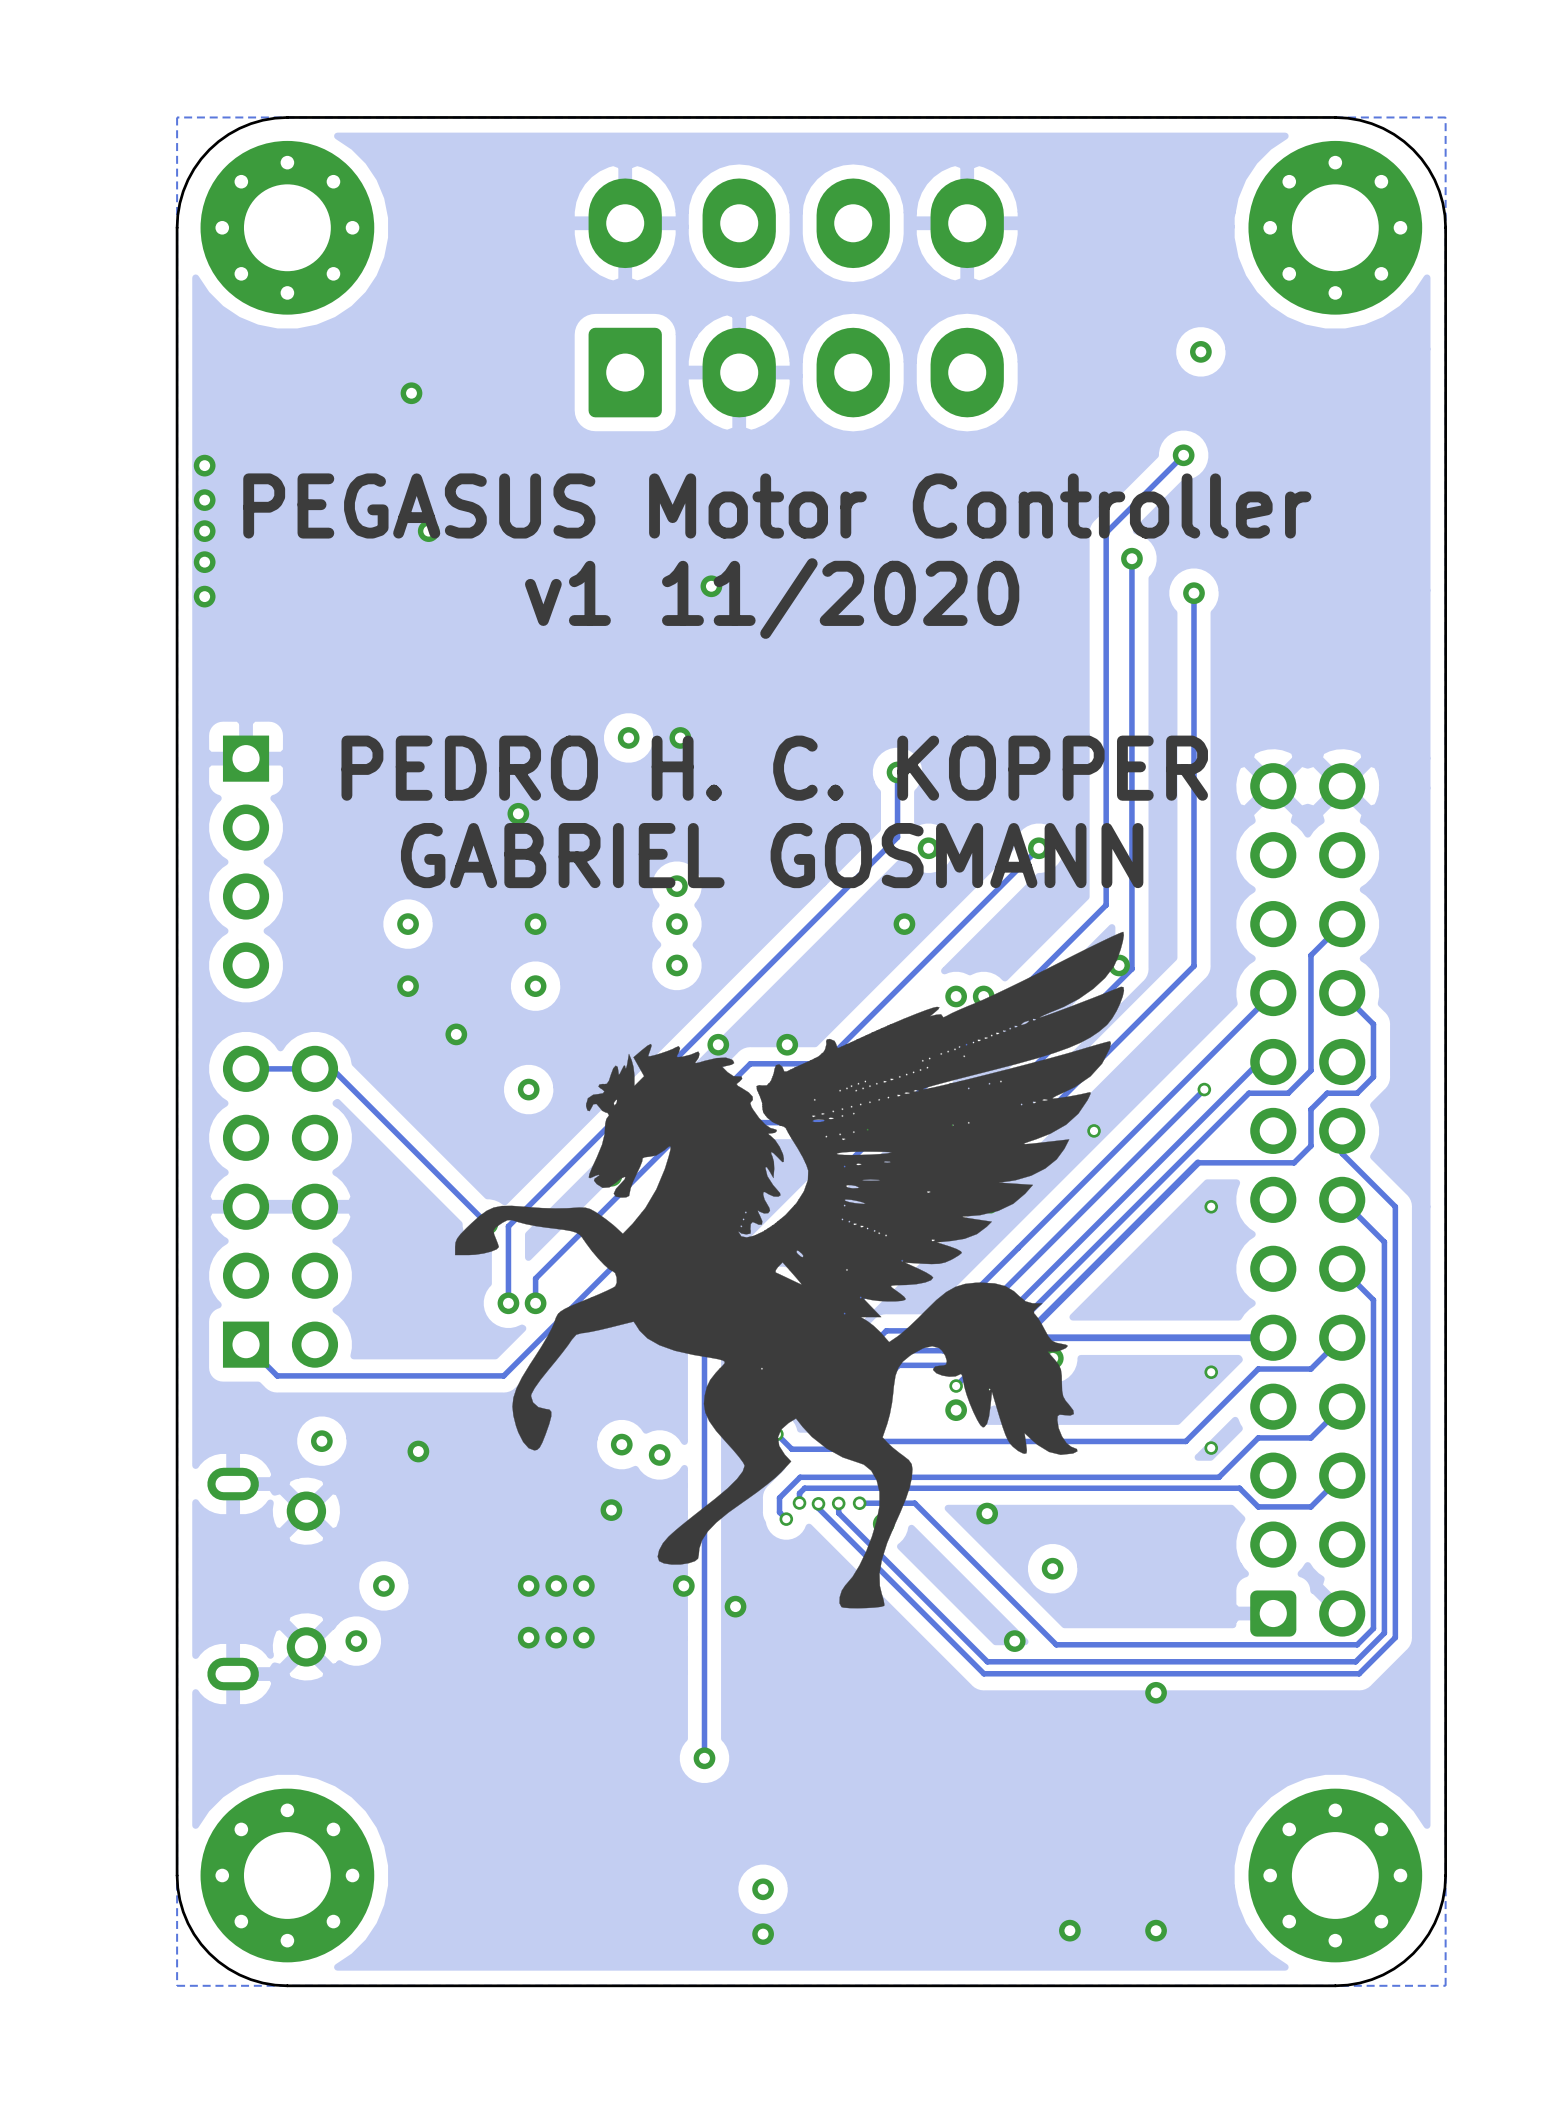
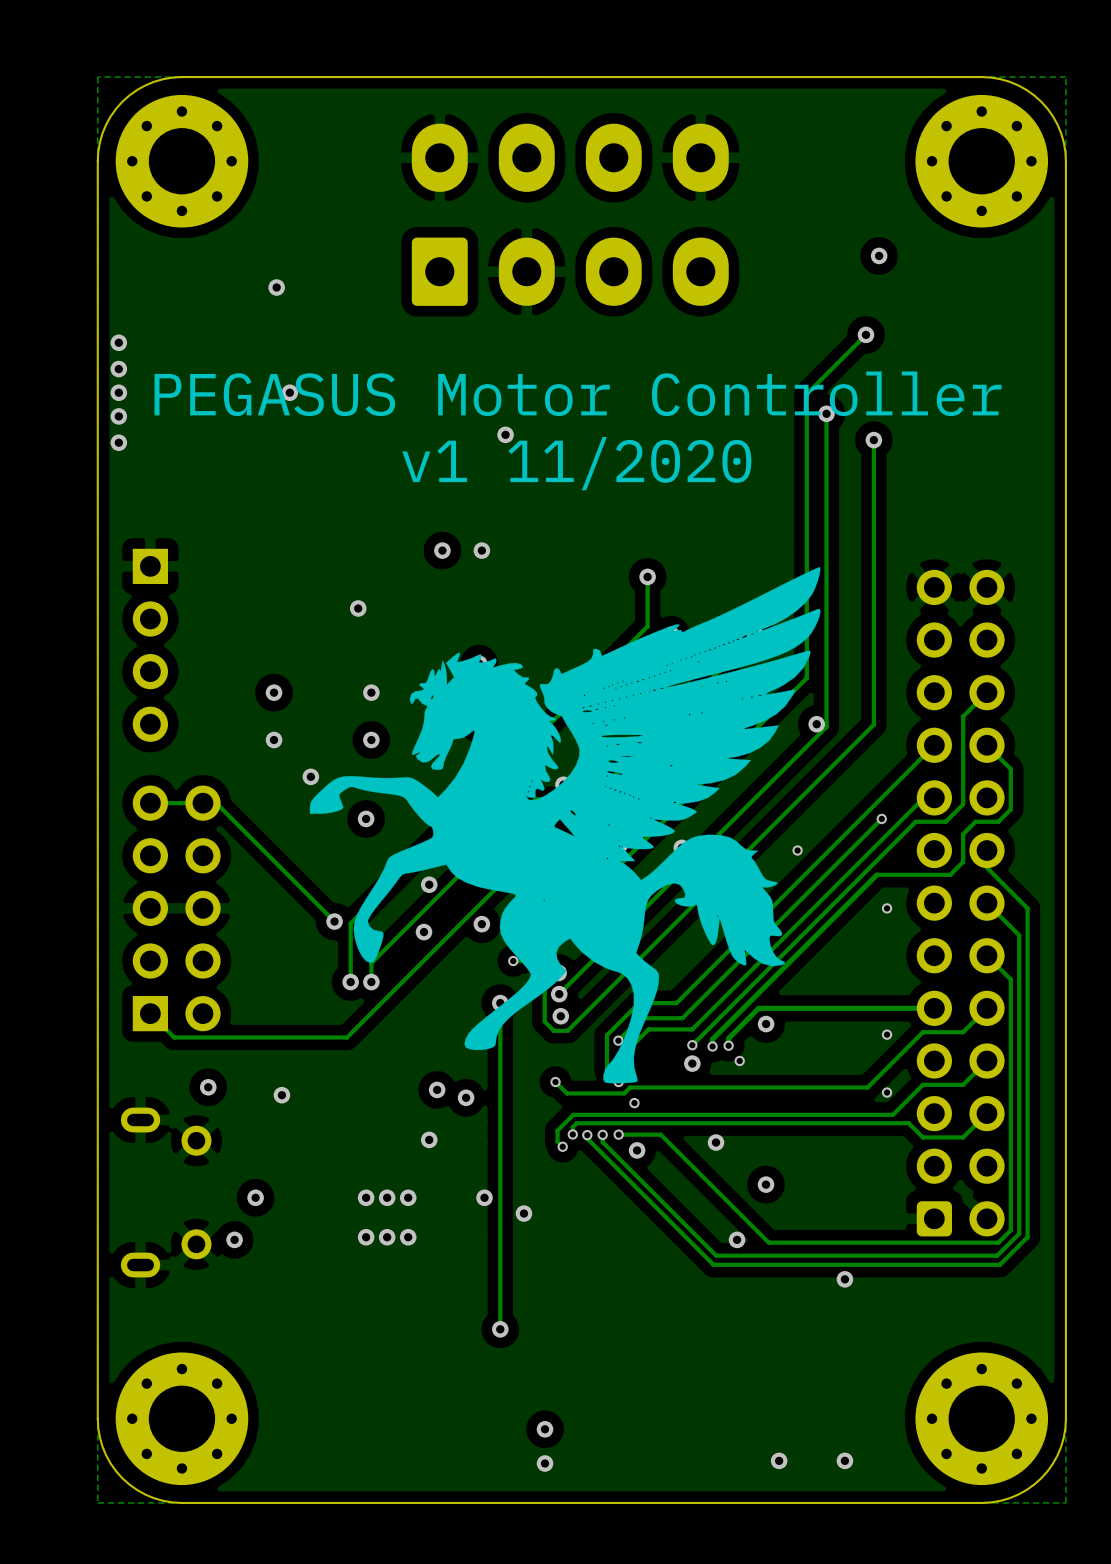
text position: PEGASUS Motor Controller (777, 505) -> PEGASUS Motor Controller (578, 393)
text position: v1 11/2020 (772, 598) -> v1 11/2020 (576, 463)
text: PEDRO H. C. KOPPER (774, 768) -> none
text: GABRIEL GOSMANN (772, 855) -> none
drawing position: (789, 1270) -> (565, 825)

